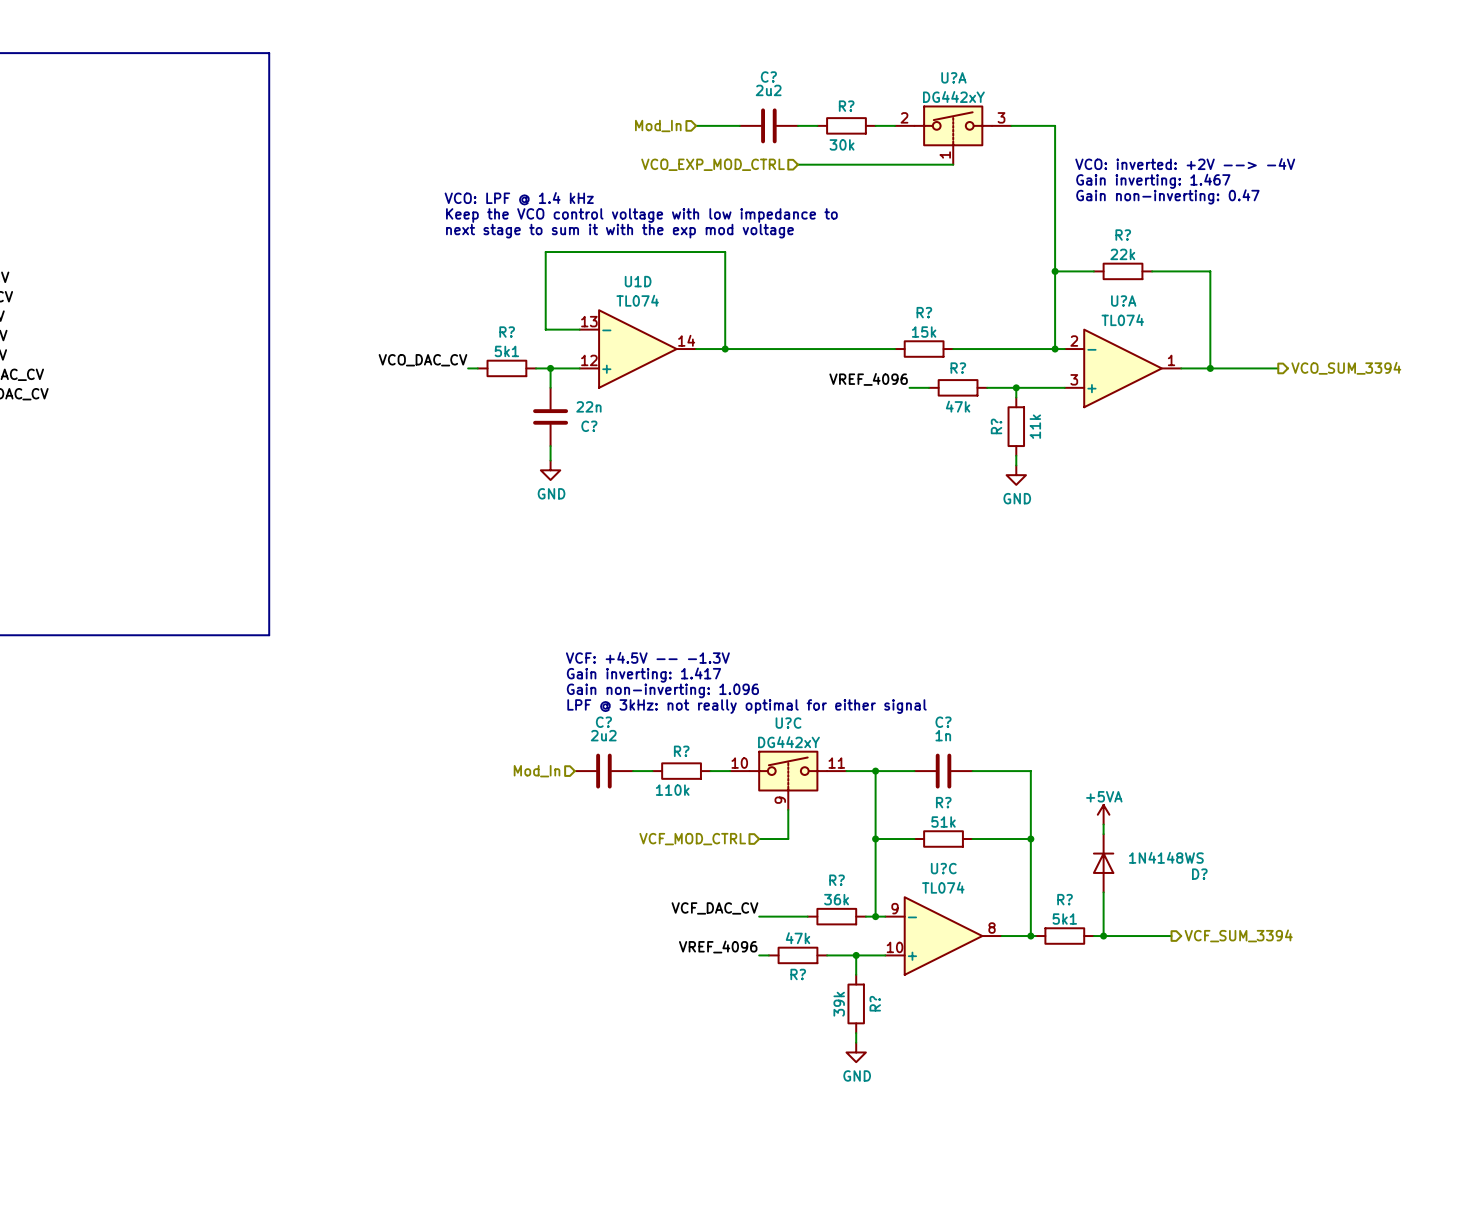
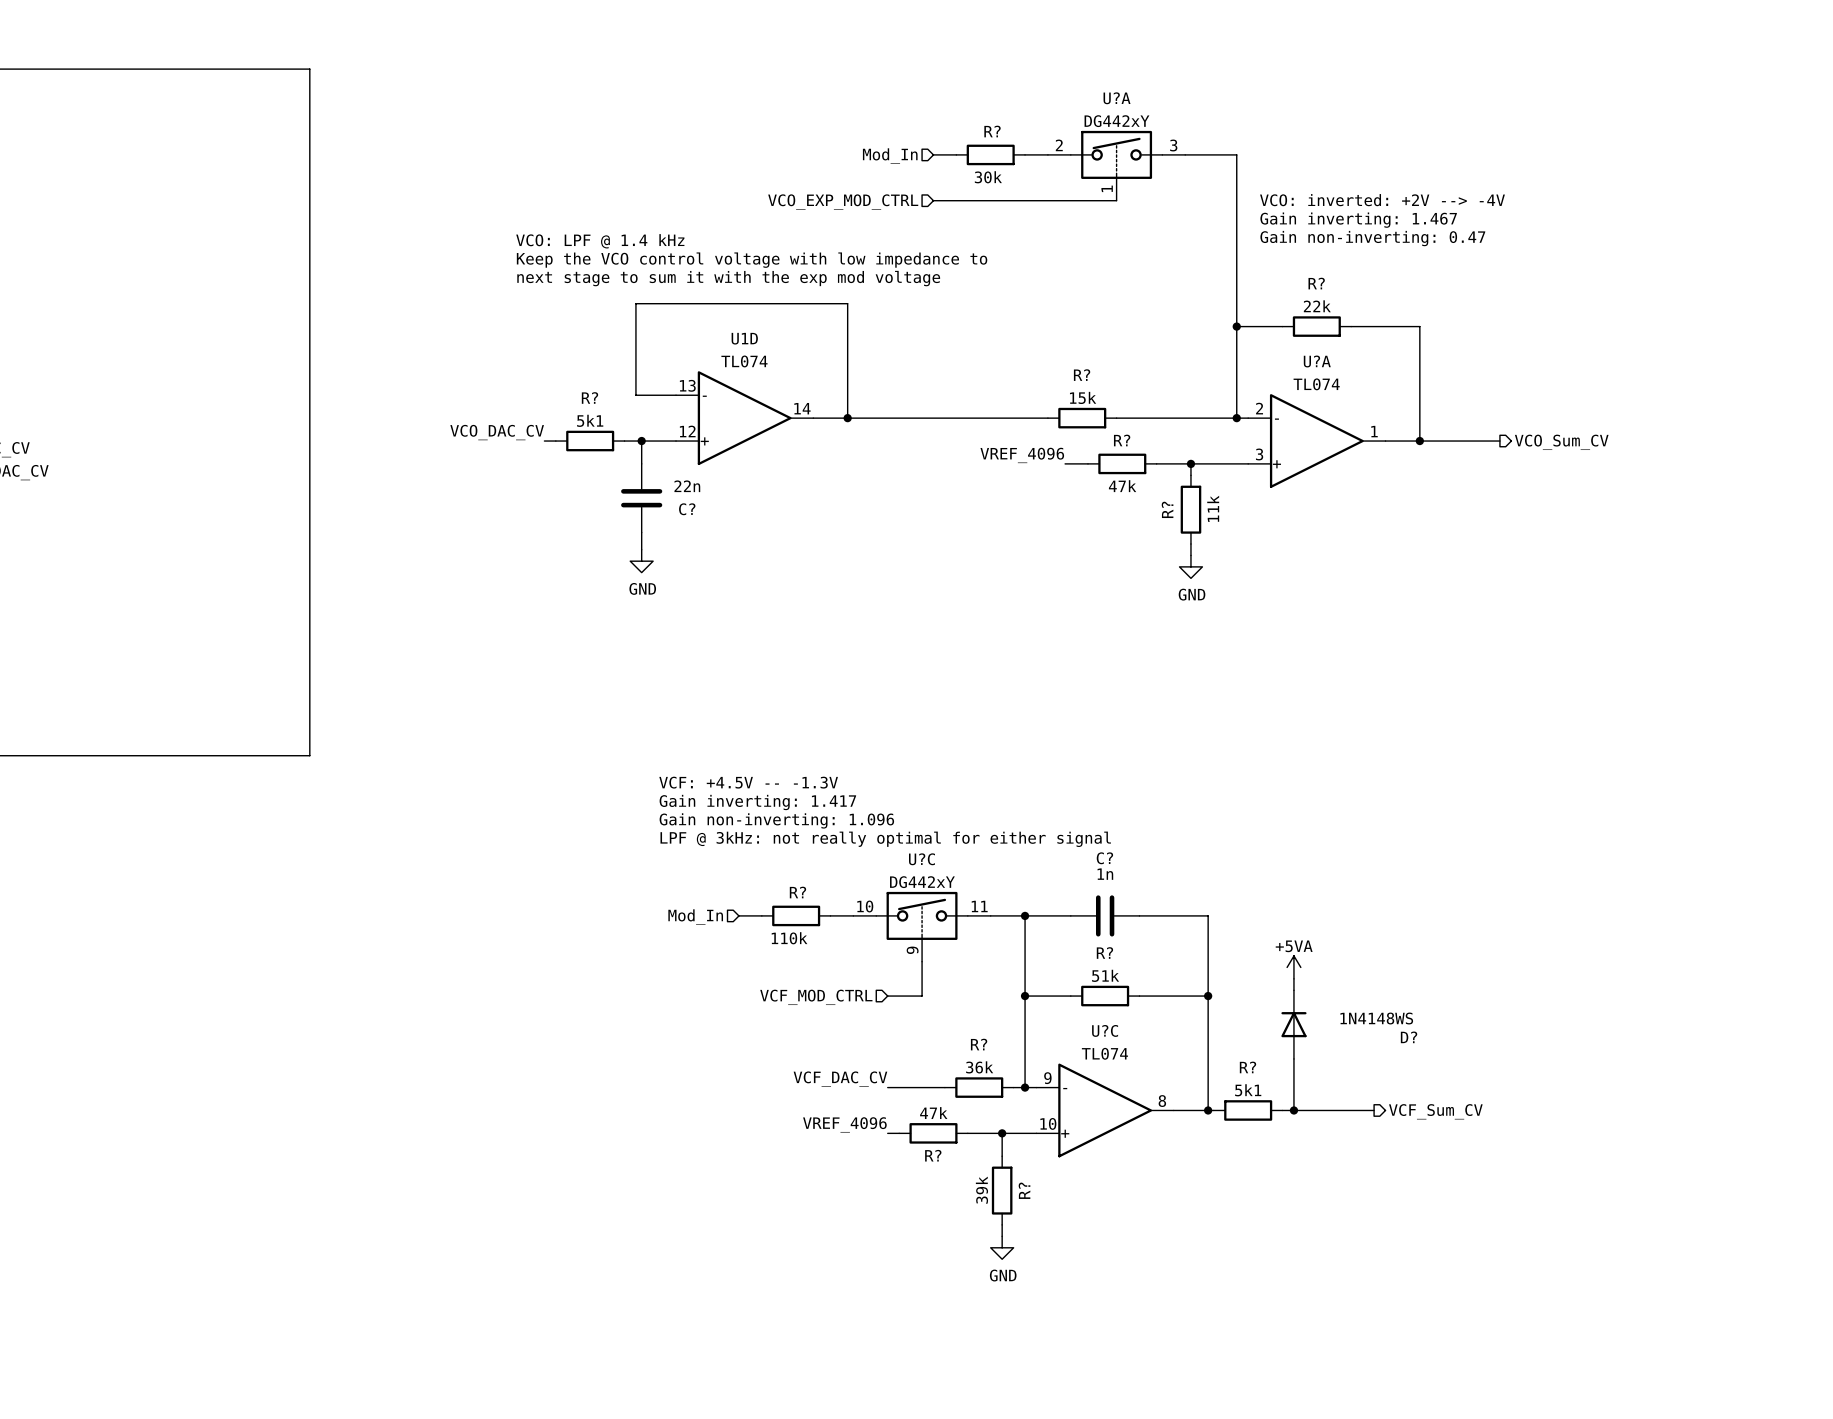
hierarchical label position: Mod_In (658, 125) -> Mod_In (890, 156)
wire: (696, 125) (739, 125) -> none
C?: 2u2 (768, 125) -> none
hierarchical label: VCO_SUM_3394 (1346, 368) -> VCO_Sum_CV (1561, 442)
hierarchical label position: Mod_In (537, 771) -> Mod_In (695, 917)
C?: 2u2 (603, 771) -> none
hierarchical label: VCF_SUM_3394 (1238, 935) -> VCF_Sum_CV (1435, 1111)

